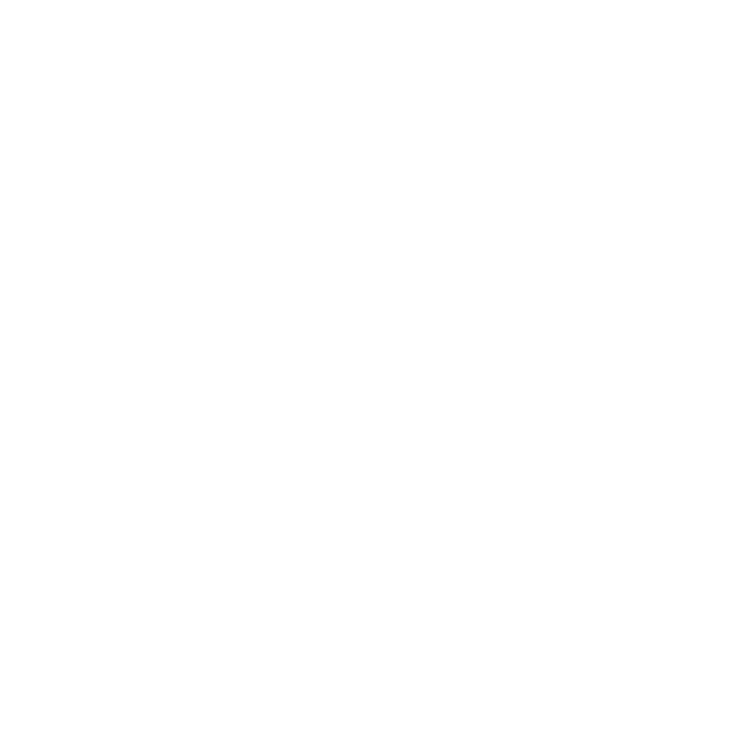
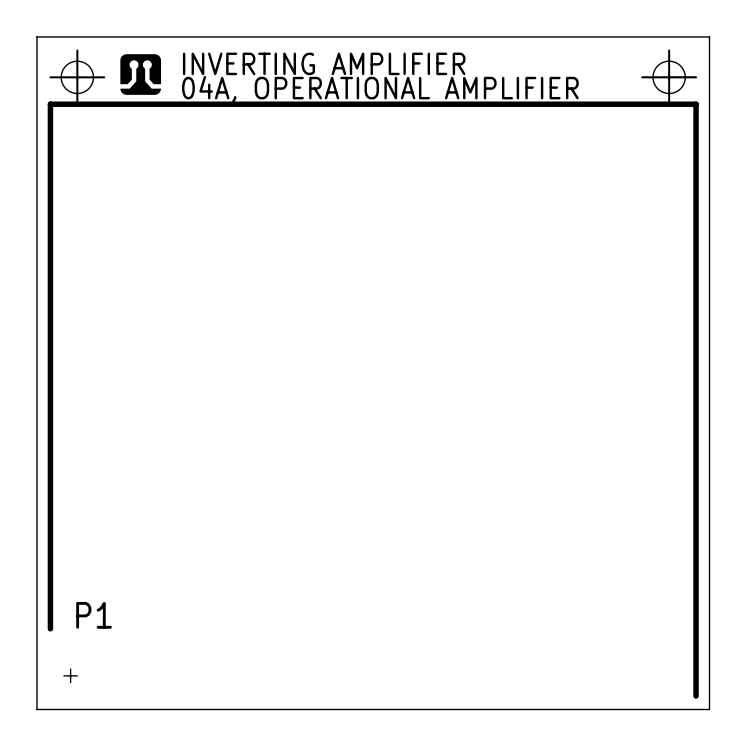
part: none -> (373, 373)

